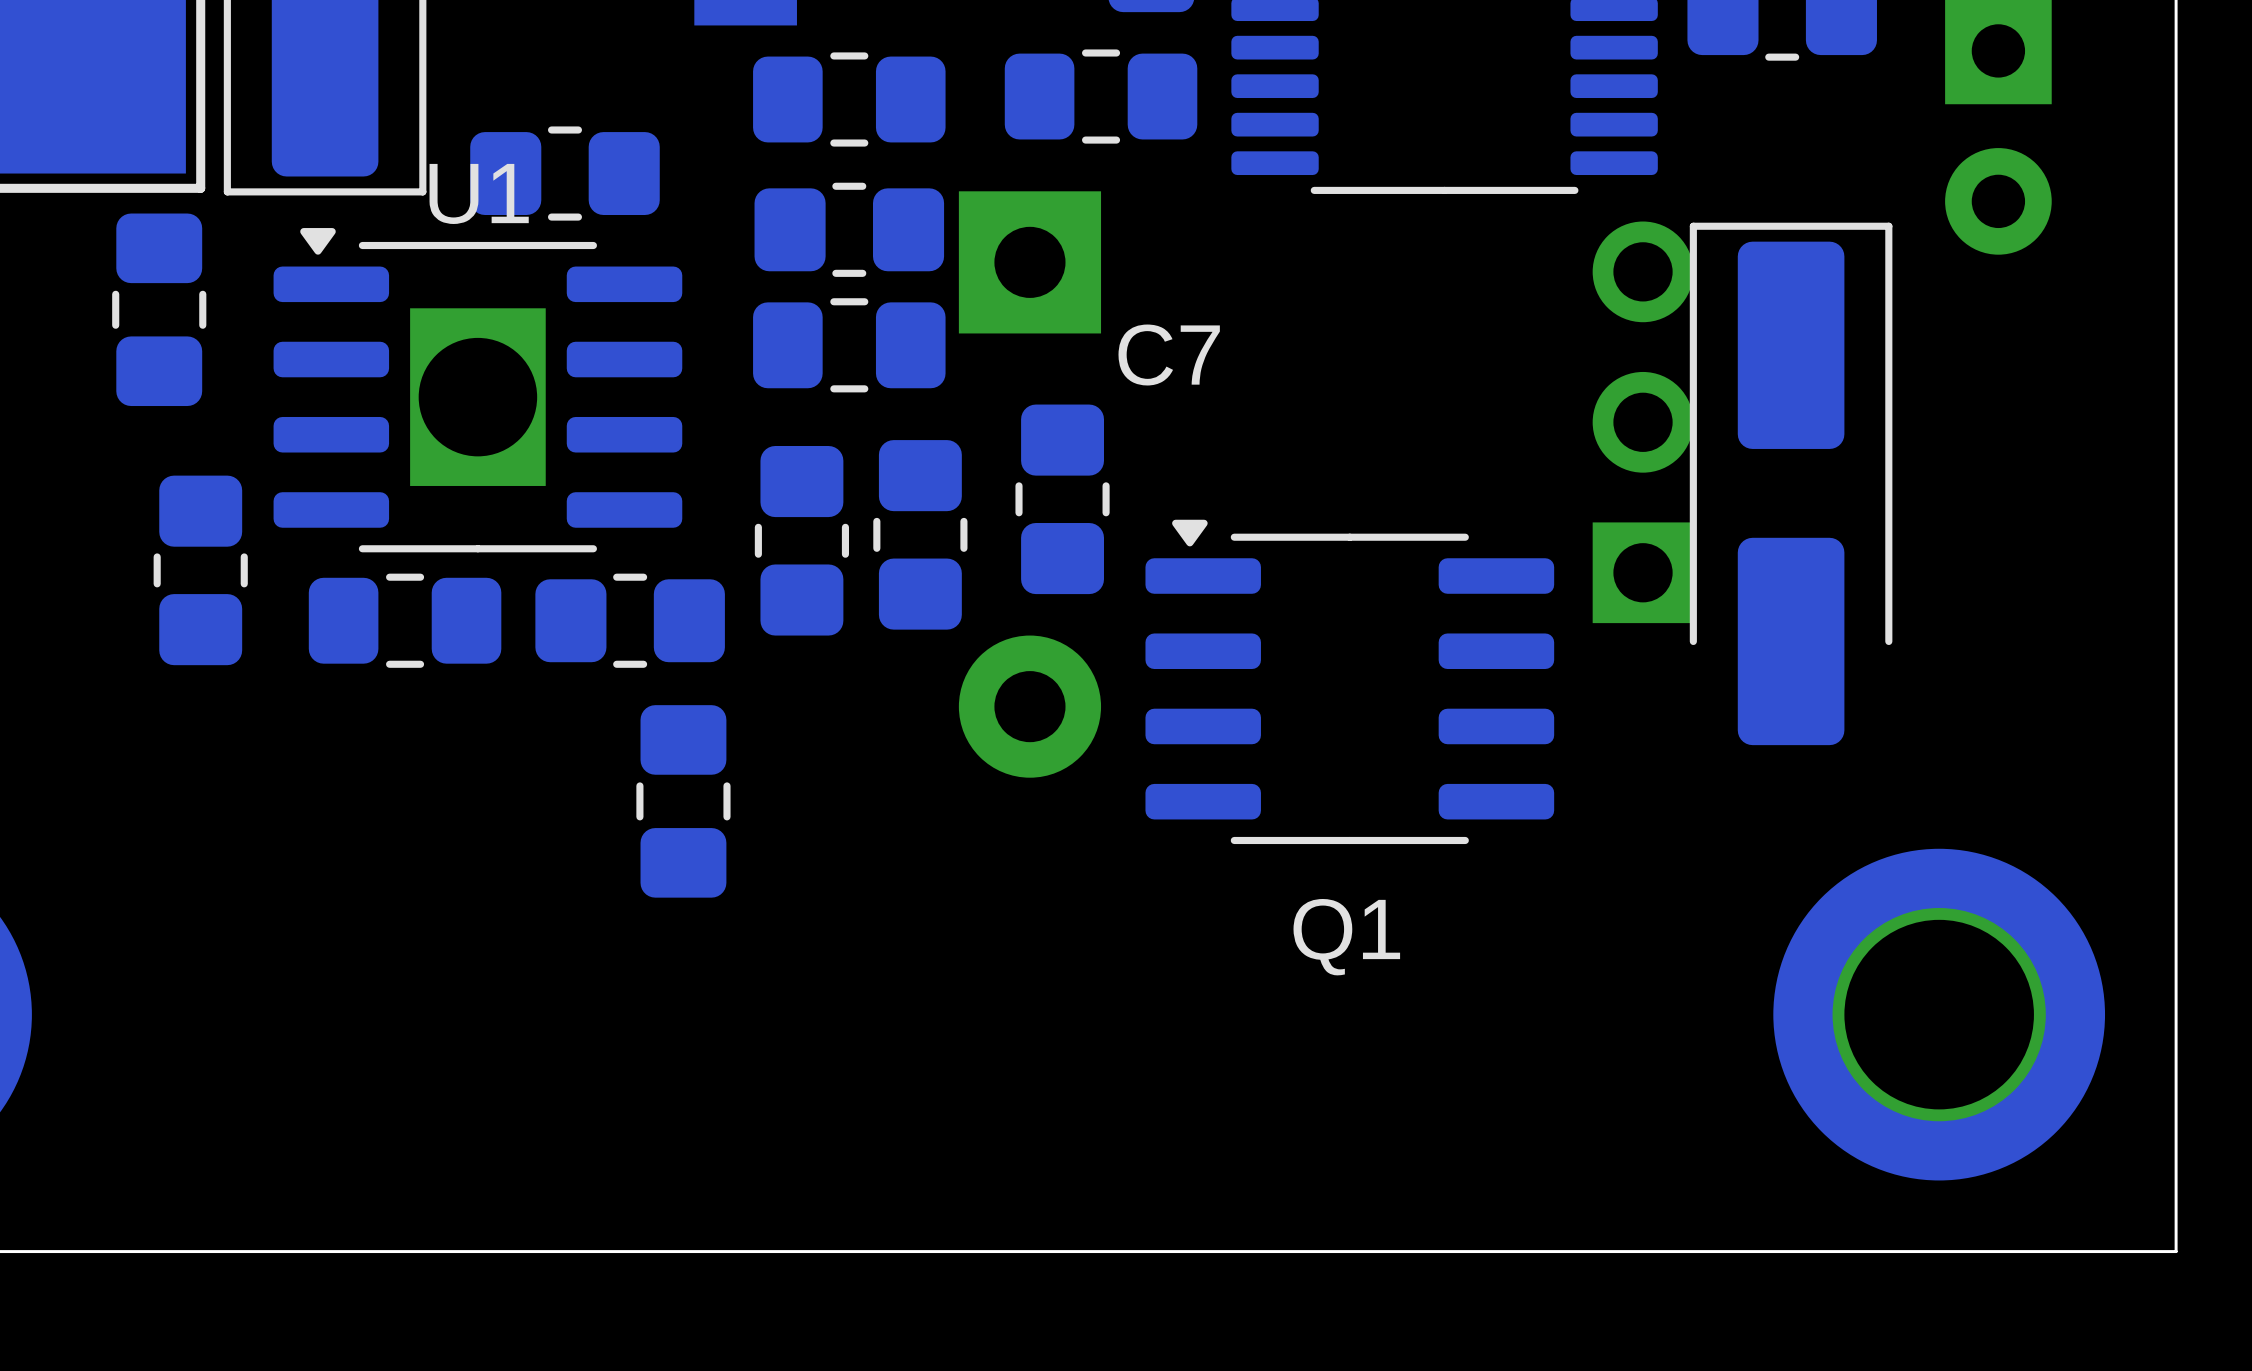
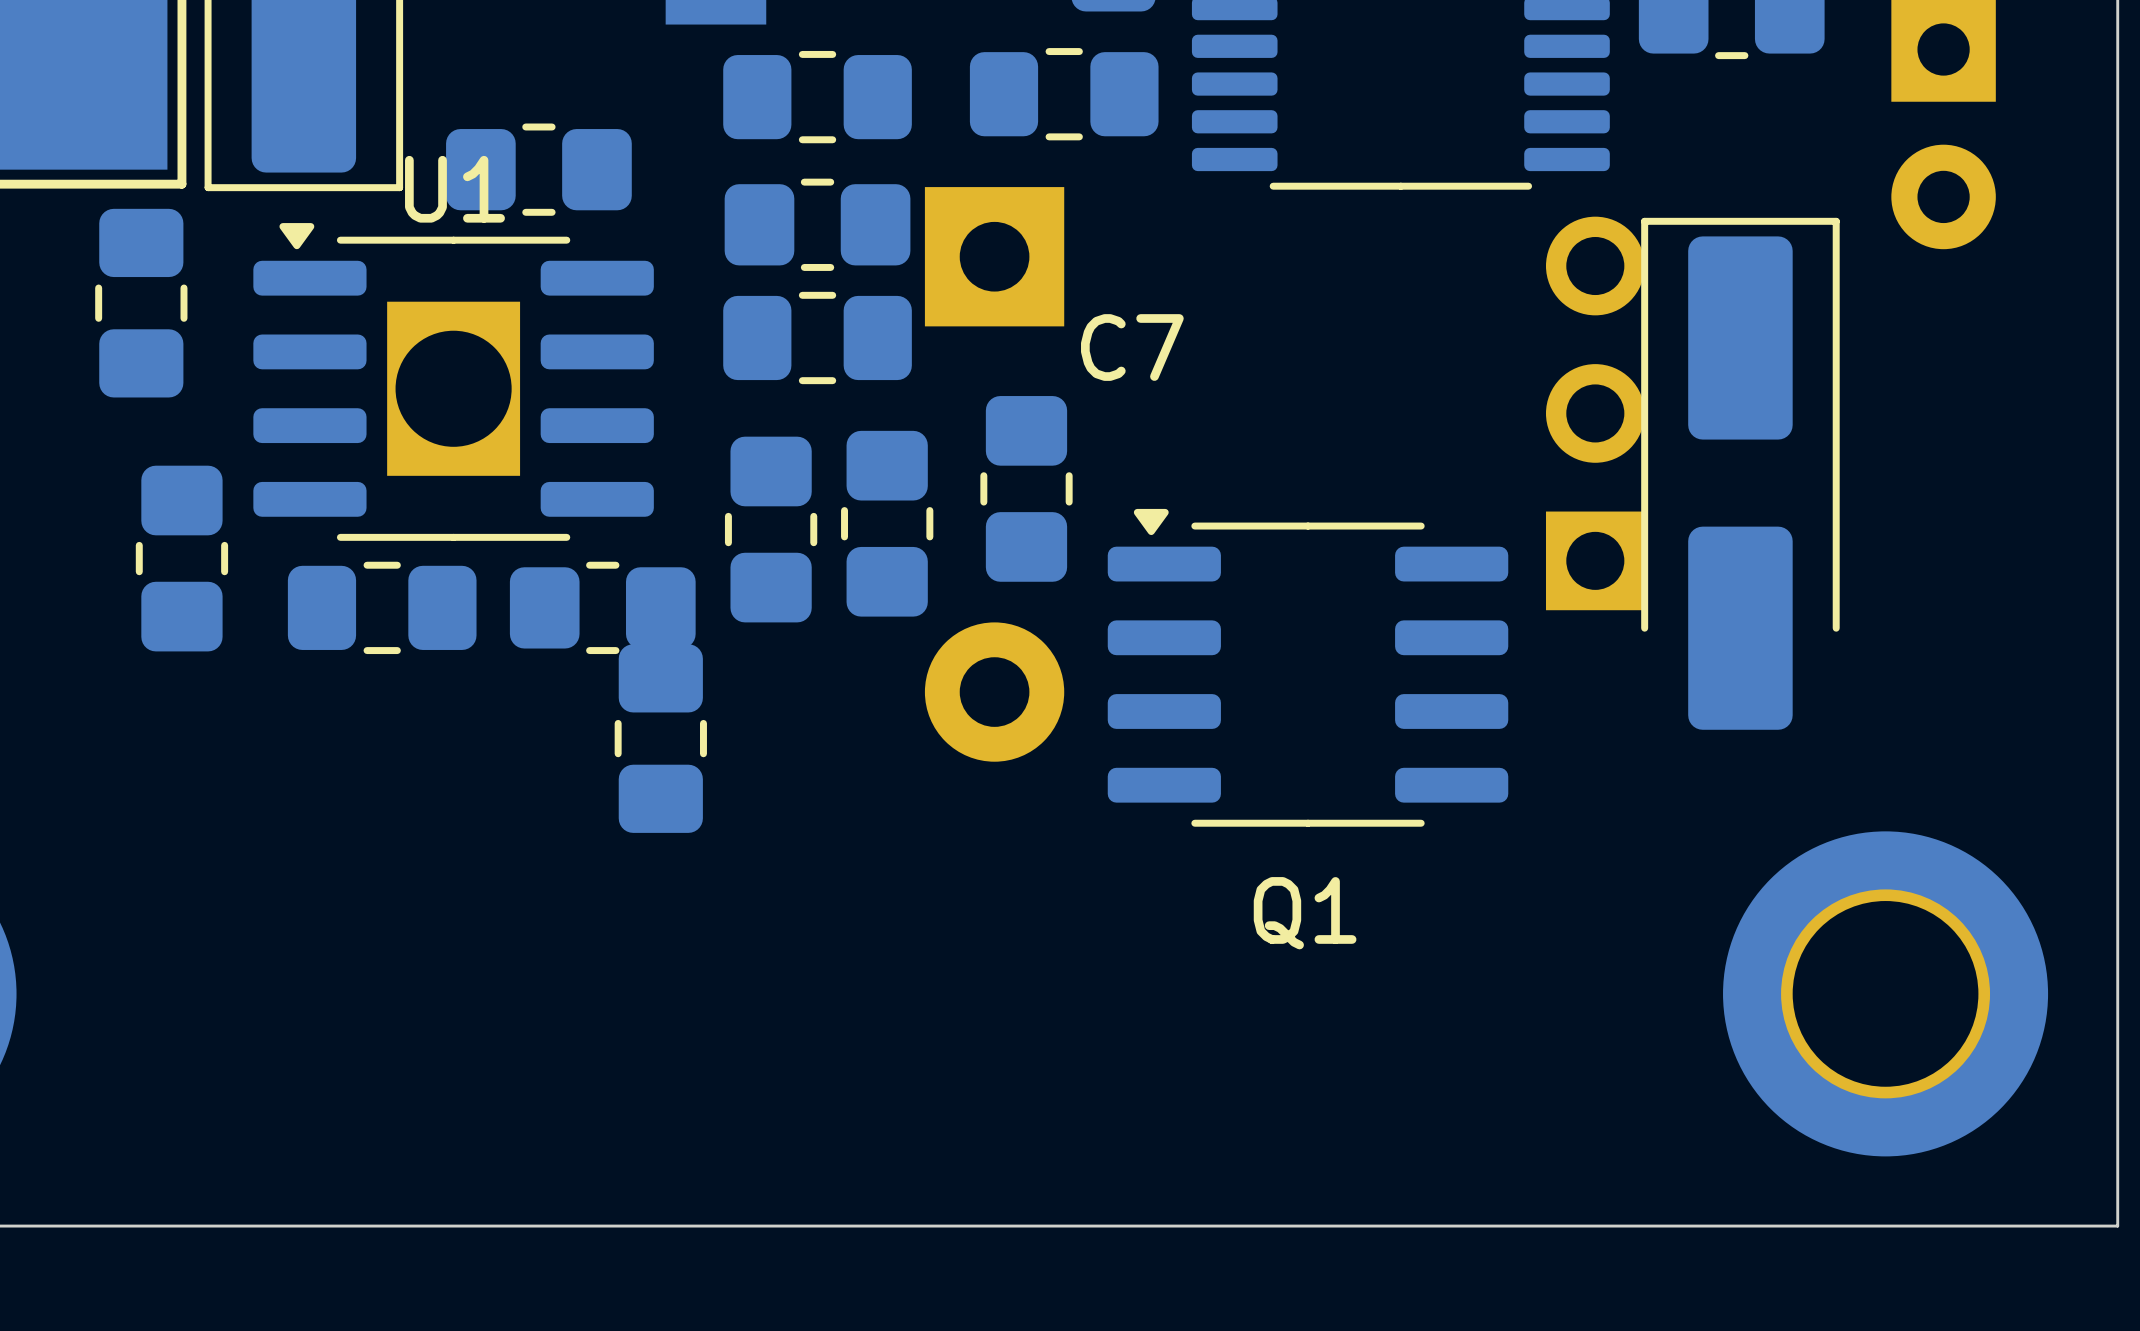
part position: (683, 801) -> (660, 738)

